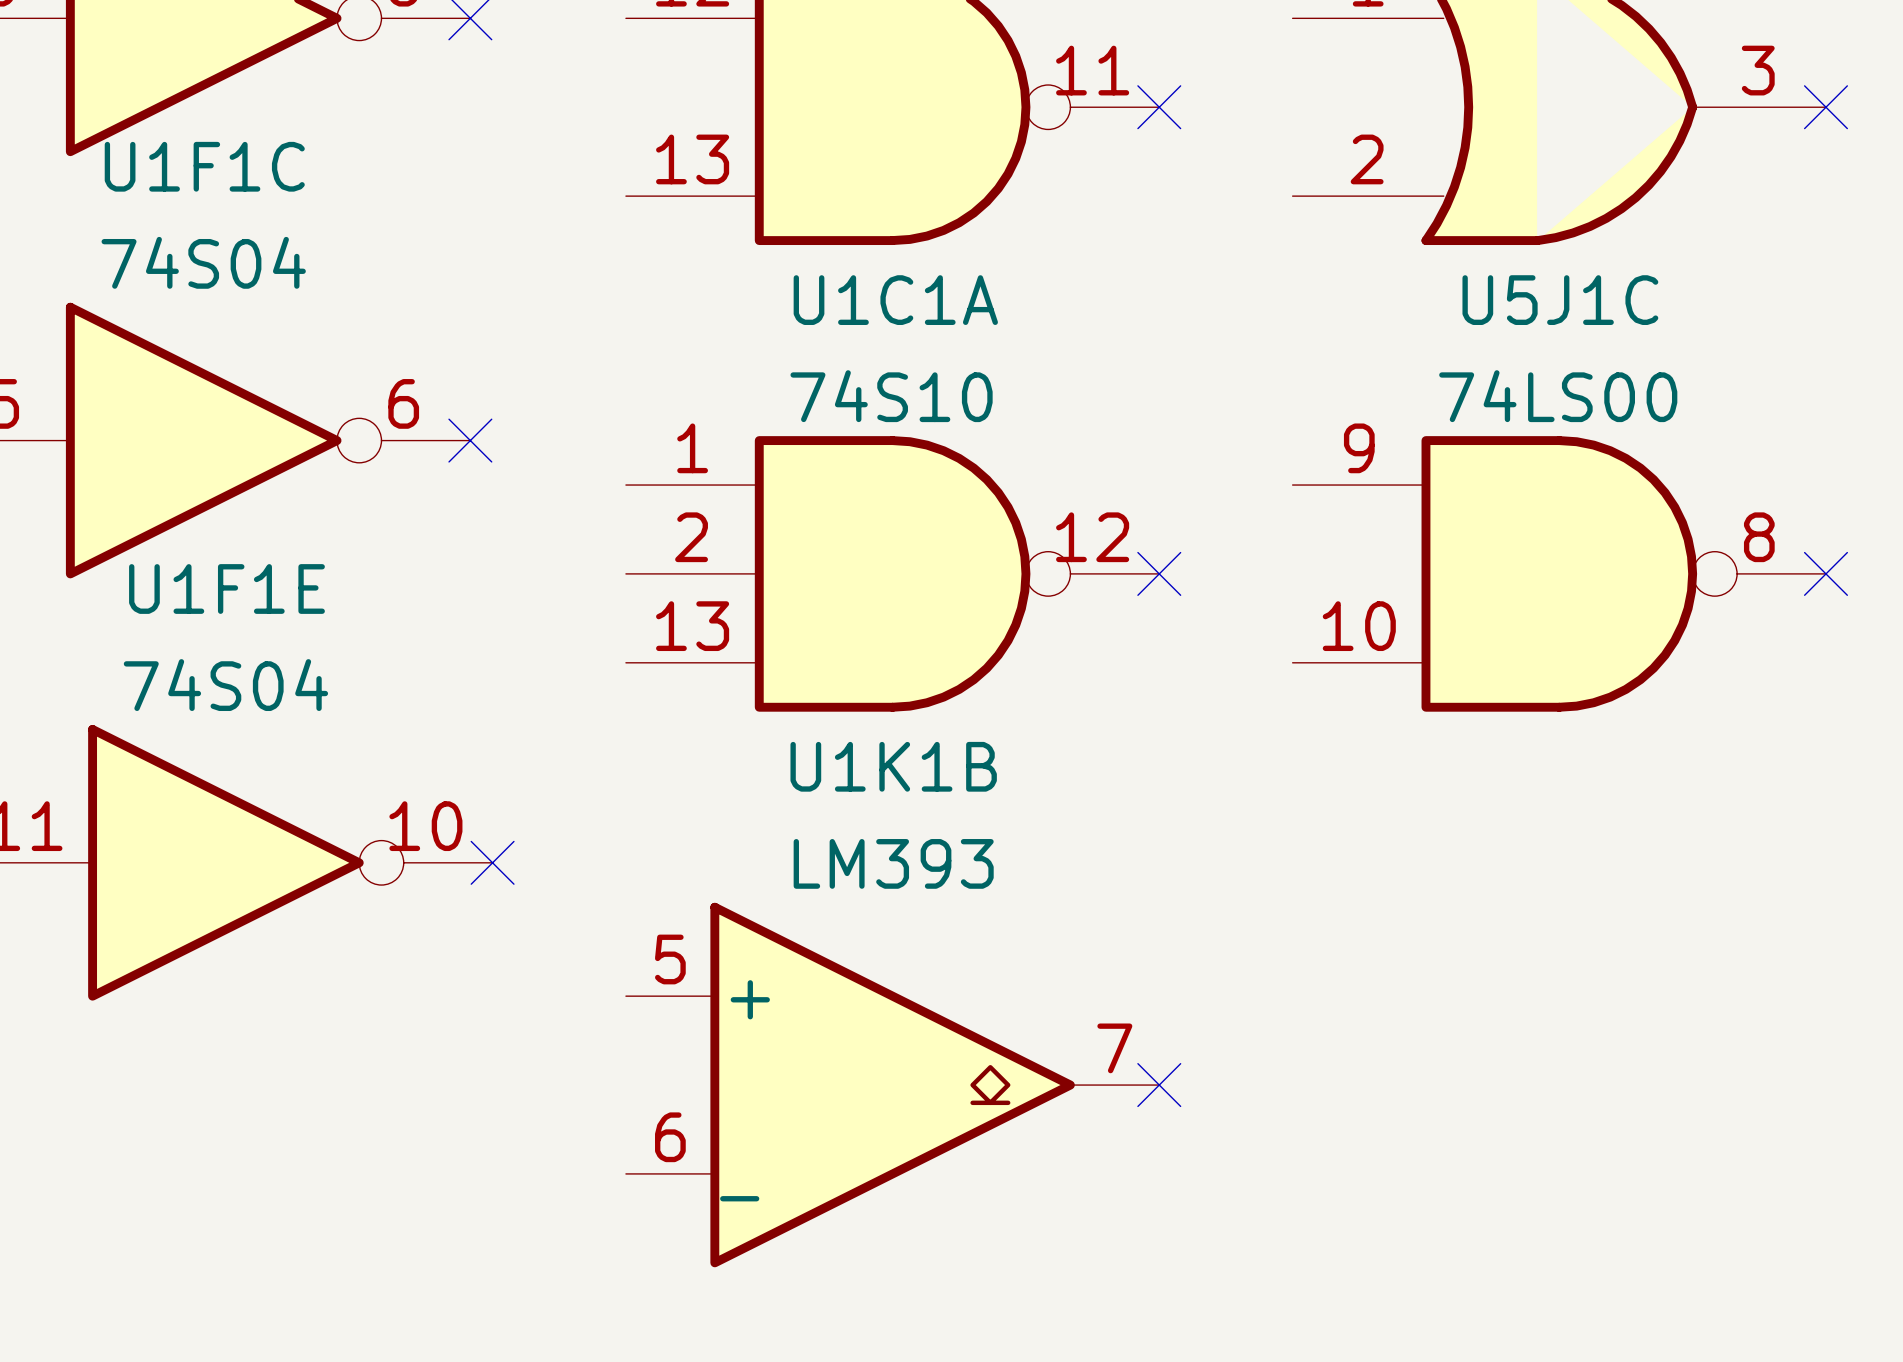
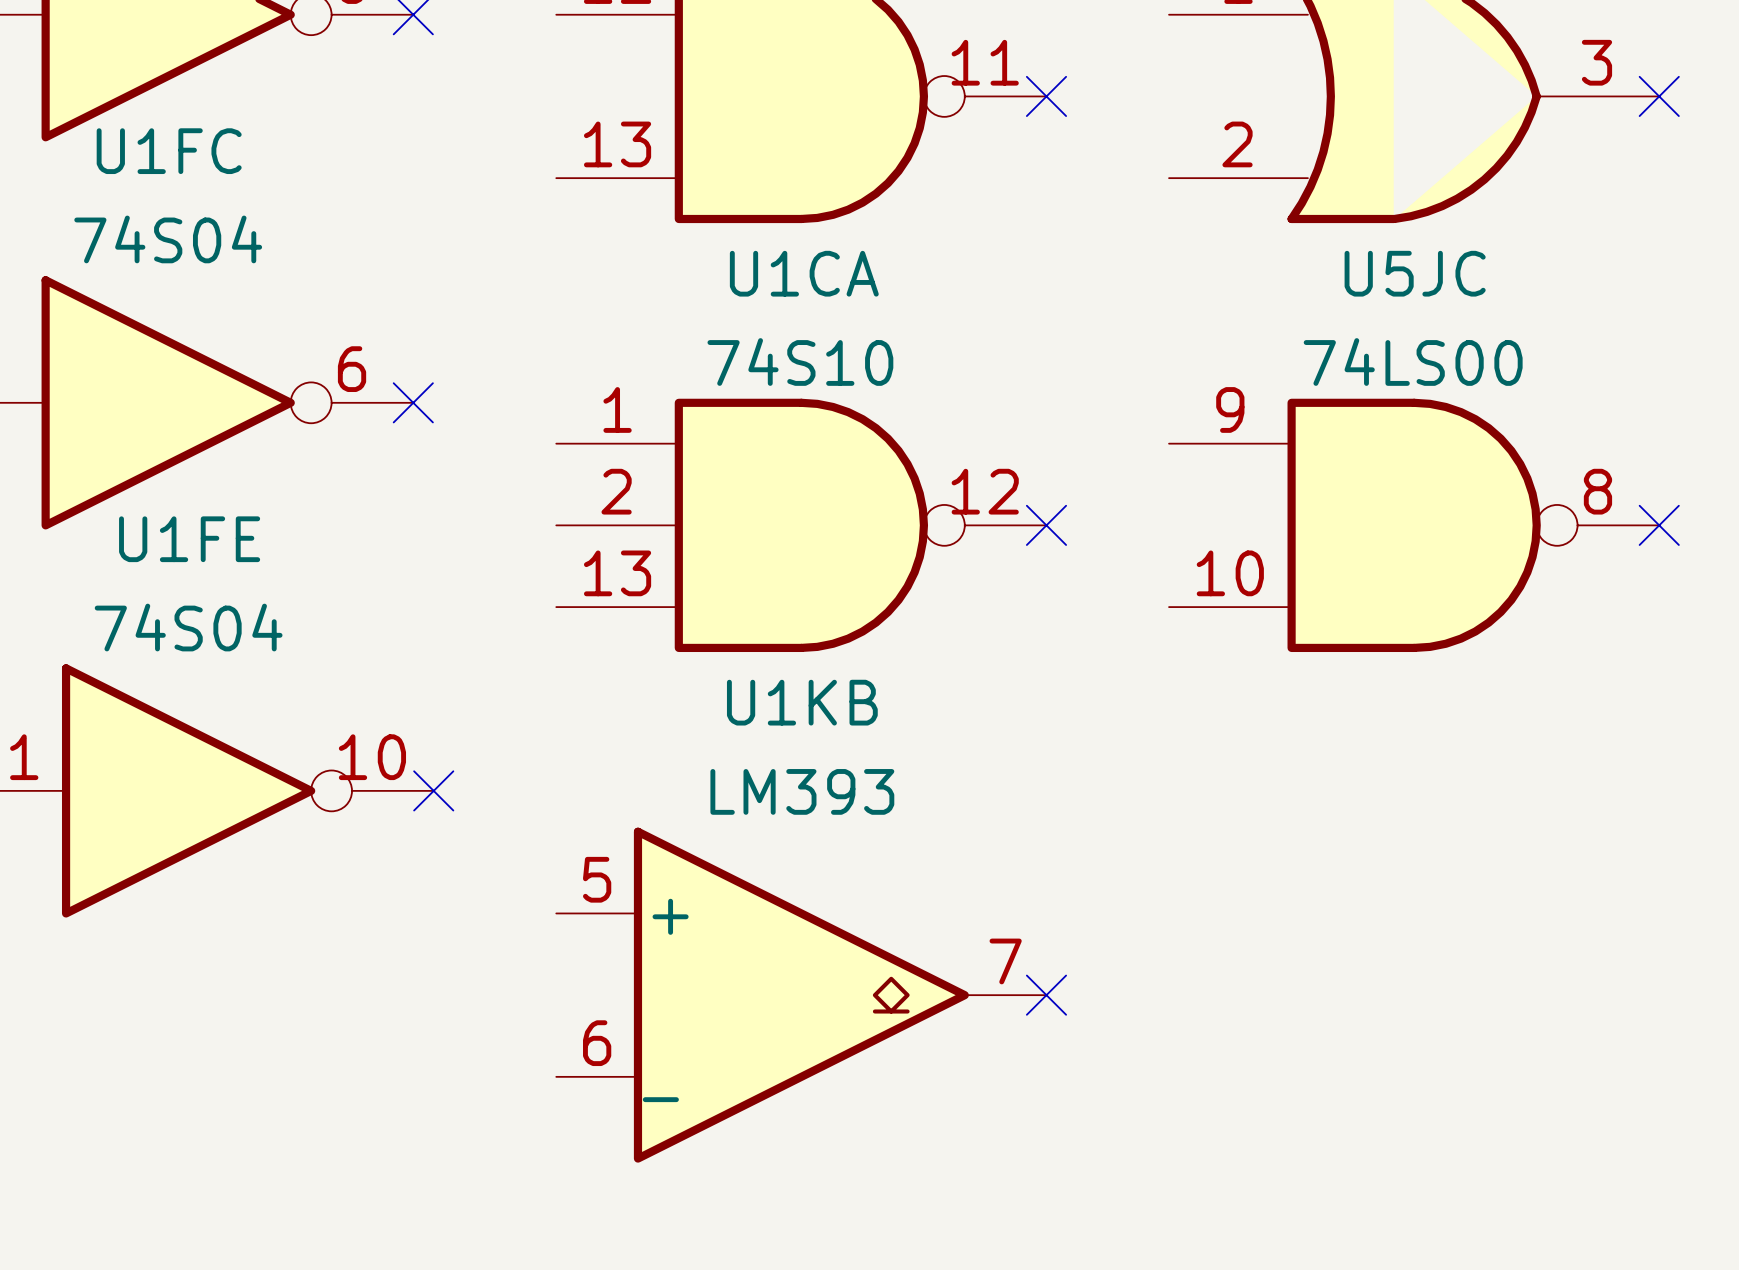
U1F1C name: U1F1C (204, 166) -> U1FC (169, 151)
U1C1A name: U1C1A (895, 300) -> U1CA (804, 273)
U5J1C name: U5J1C (1560, 300) -> U5JC (1415, 273)
U1F1E name: U1F1E (226, 589) -> U1FE (189, 539)
U1K1B name: U1K1B (893, 766) -> U1KB (802, 702)

